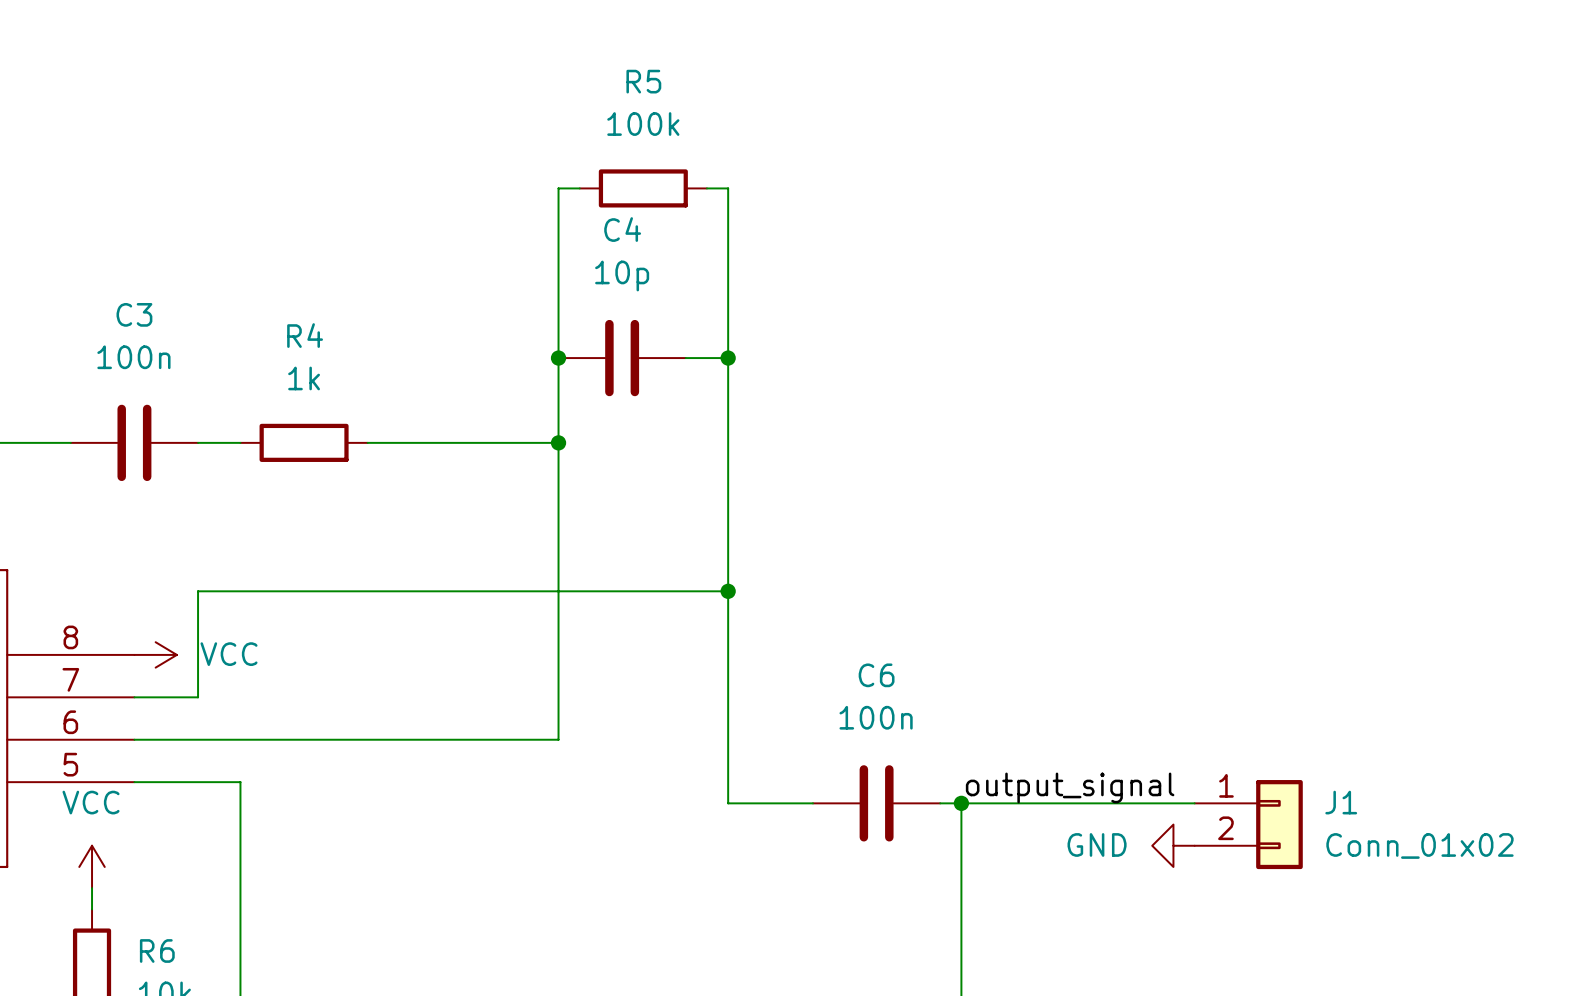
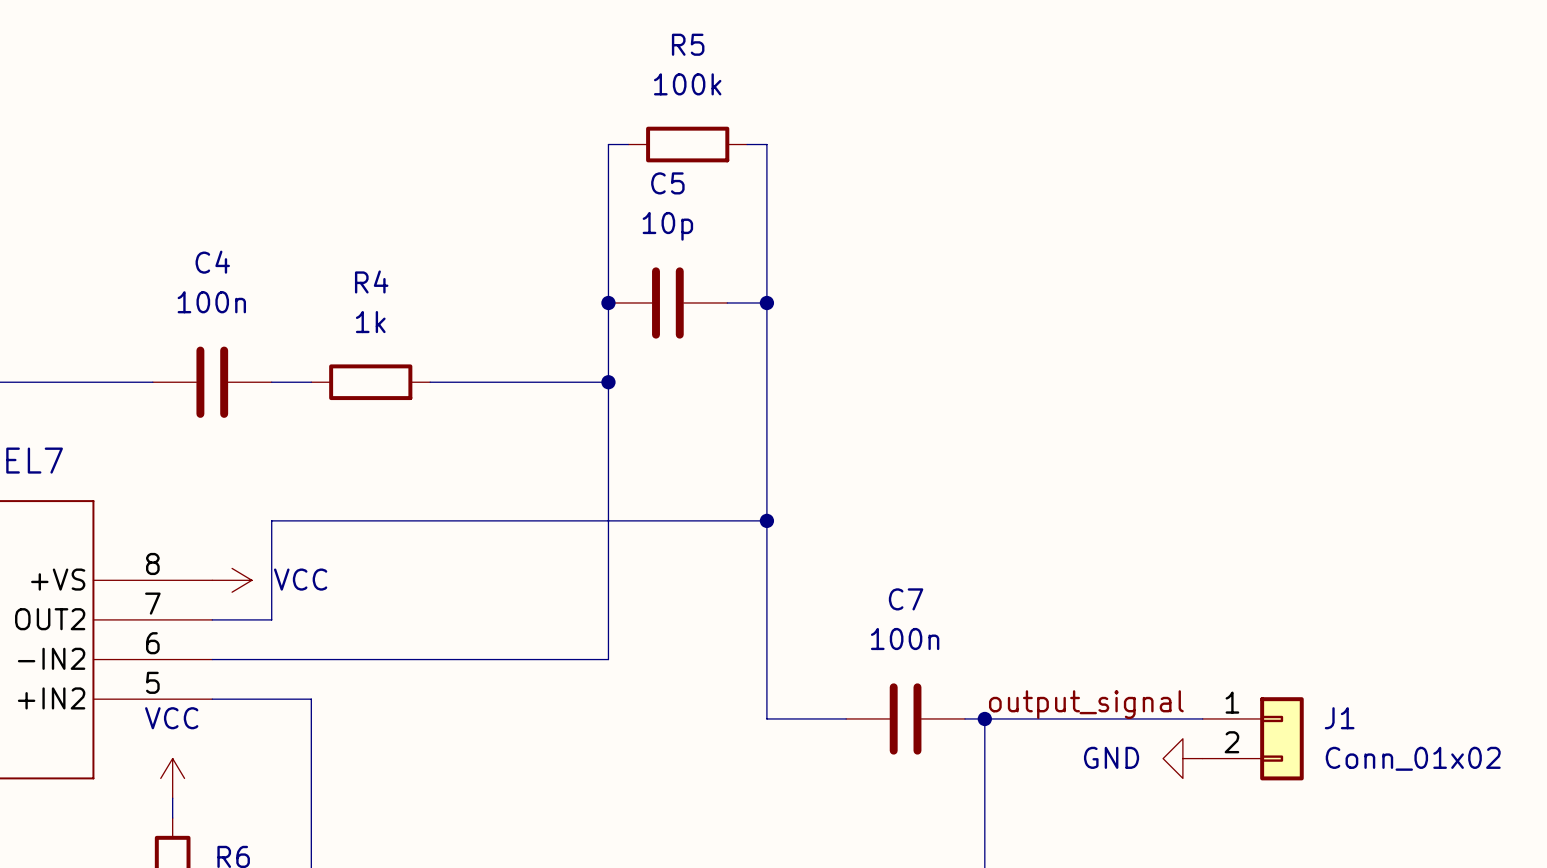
C4 name: C4 (622, 229) -> C5 (667, 183)
C3 name: C3 (134, 314) -> C4 (212, 262)
C6 name: C6 (876, 675) -> C7 (906, 599)

